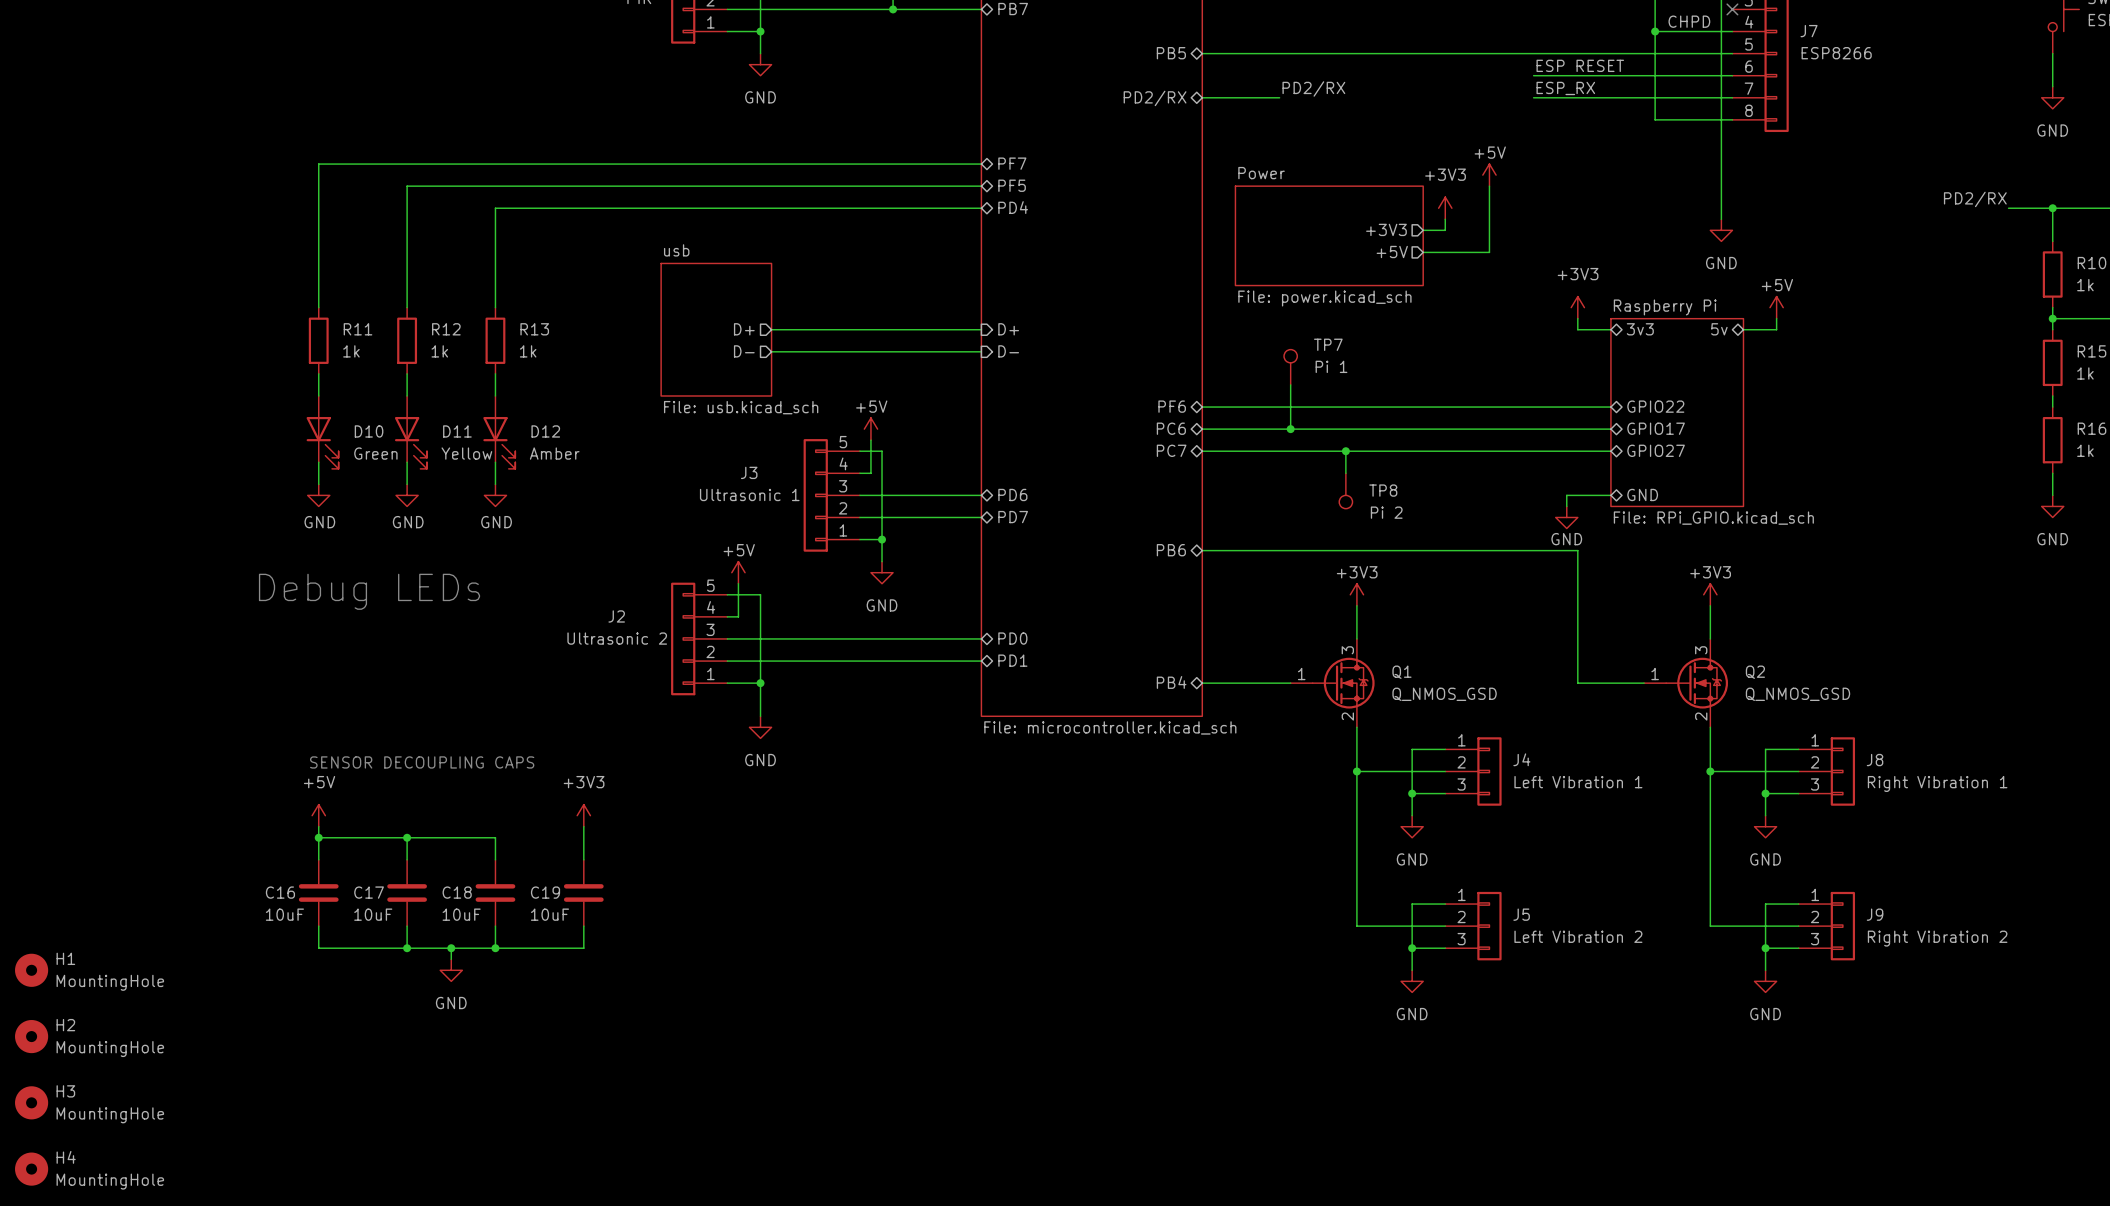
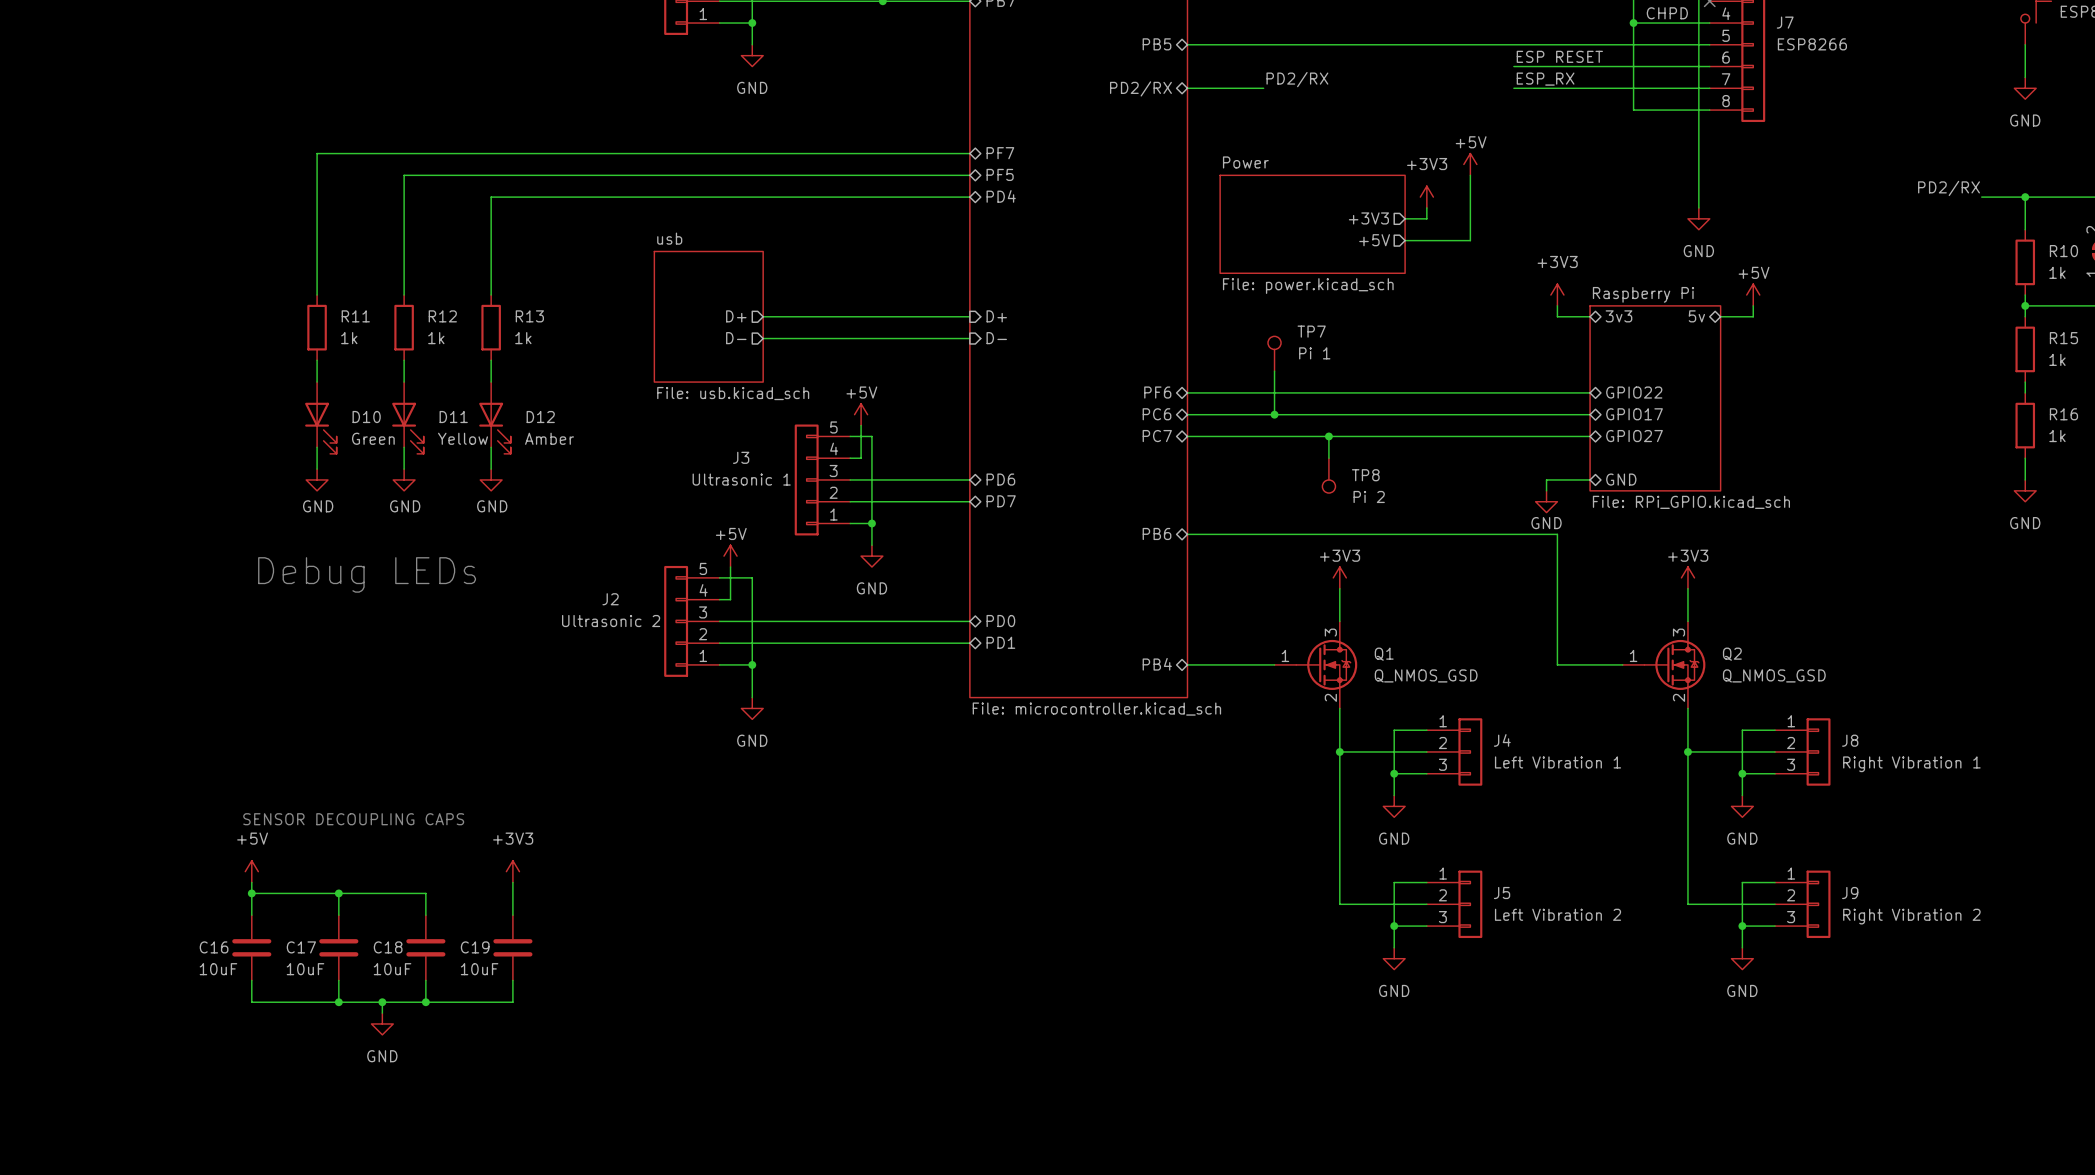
text position: SENSOR DECOUPLING CAPS (422, 762) -> SENSOR DECOUPLING CAPS (353, 819)
power symbol position: +5V (318, 815) -> +5V (251, 871)
power symbol position: +3V3 (583, 815) -> +3V3 (512, 871)
wire: (318, 826) (318, 859) -> (251, 882) (251, 915)
wire: (583, 826) (583, 859) -> (512, 882) (512, 915)
wire: (318, 837) (495, 837) (495, 859) -> (251, 893) (425, 893) (425, 915)
junction: (318, 837) -> none
wire: (407, 837) (407, 859) -> (338, 893) (338, 915)
junction: (407, 837) -> none
C16 position: (318, 892) -> (251, 947)
C17 position: (407, 892) -> (338, 947)
C18 position: (495, 892) -> (425, 947)
C19 position: (583, 892) -> (512, 947)
junction: none -> (251, 893)
junction: none -> (338, 893)
wire: (318, 926) (318, 948) (583, 948) (583, 926) -> (251, 980) (251, 1002) (512, 1002) (512, 980)
wire: (407, 926) (407, 948) -> (338, 980) (338, 1002)
wire: (495, 926) (495, 948) -> (425, 980) (425, 1002)
junction: (407, 948) -> none
wire: (451, 948) (451, 959) -> (382, 1002) (382, 1013)
junction: (451, 948) -> none
junction: (495, 948) -> none
H1: MountingHole (31, 970) -> none
power symbol position: GND (451, 970) -> GND (382, 1023)
junction: none -> (338, 1002)
junction: none -> (382, 1002)
junction: none -> (425, 1002)
H2: MountingHole (31, 1036) -> none
H3: MountingHole (31, 1102) -> none
H4: MountingHole (31, 1169) -> none

